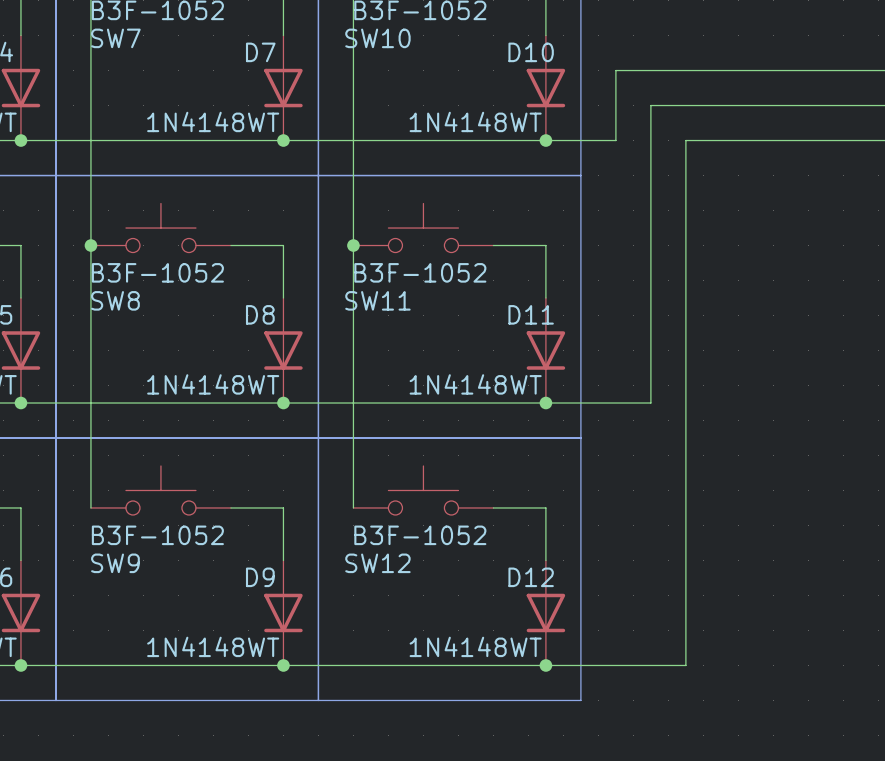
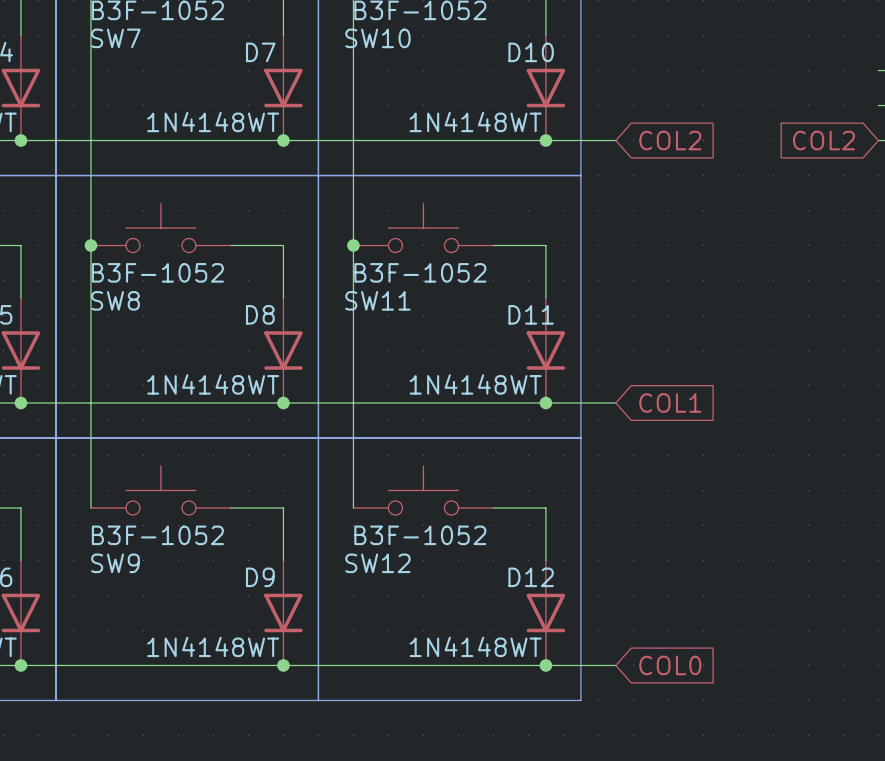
wire: (878, 70) (615, 70) (615, 140) -> none
wire: (878, 105) (650, 105) (650, 403) (615, 403) -> none
global label: none -> COL2 (670, 140)
global label: none -> COL2 (823, 140)
wire: (878, 140) (685, 140) (685, 665) (615, 665) -> none
global label: none -> COL1 (670, 403)
global label: none -> COL0 (670, 665)

